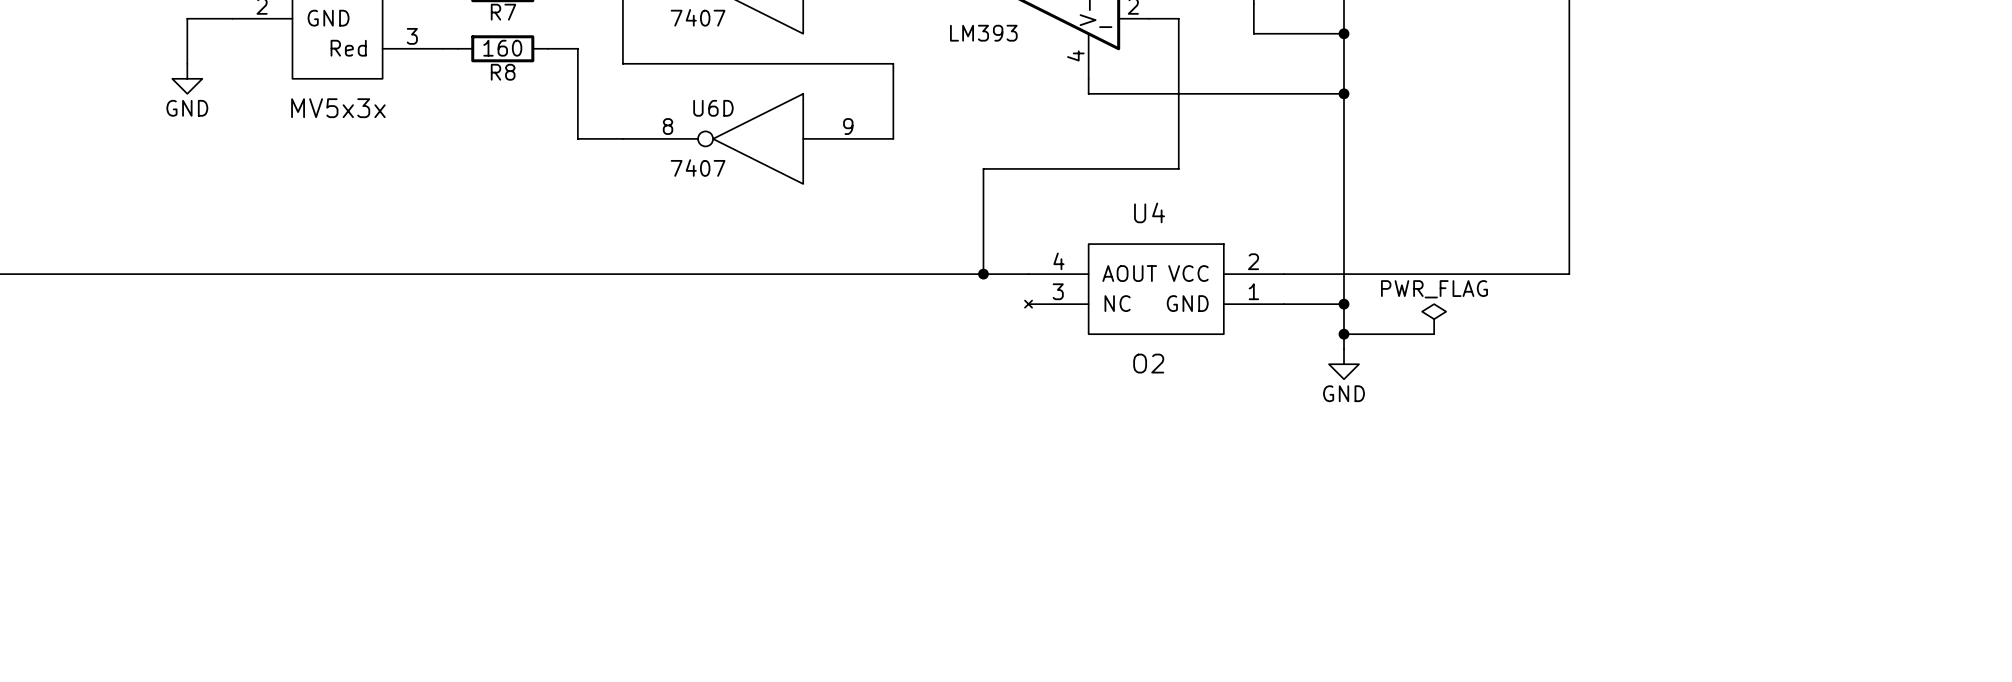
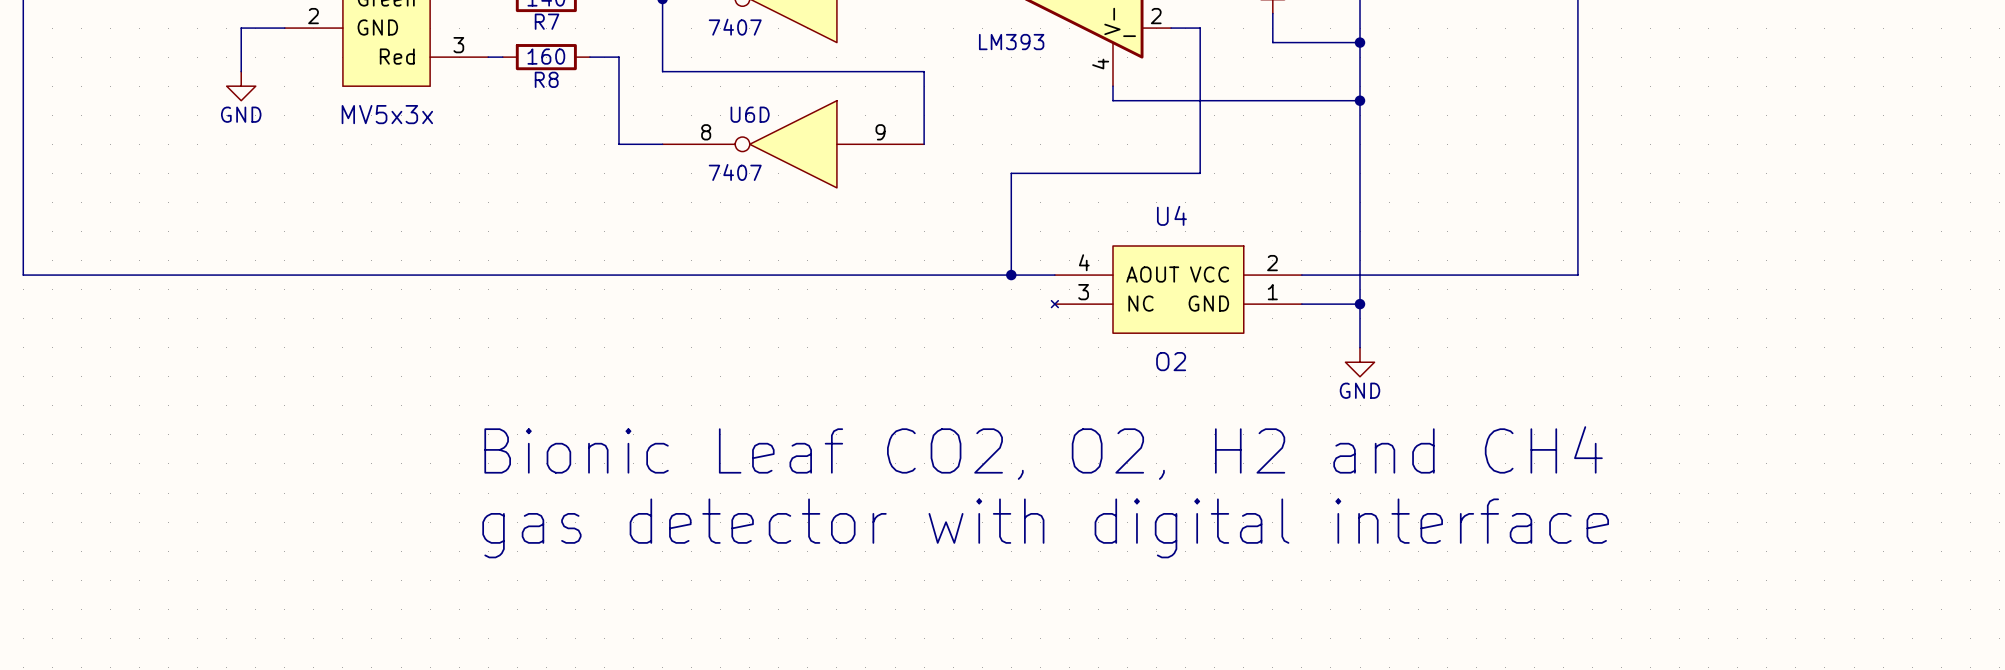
power symbol: PWR_FLAG (1434, 319) -> none
wire: (1344, 334) (1434, 334) -> none
junction: (1344, 334) -> none
text: none -> Bionic Leaf CO2, O2, H2 and CH4 (1043, 453)
text: none -> gas detector with digital interface (1045, 528)

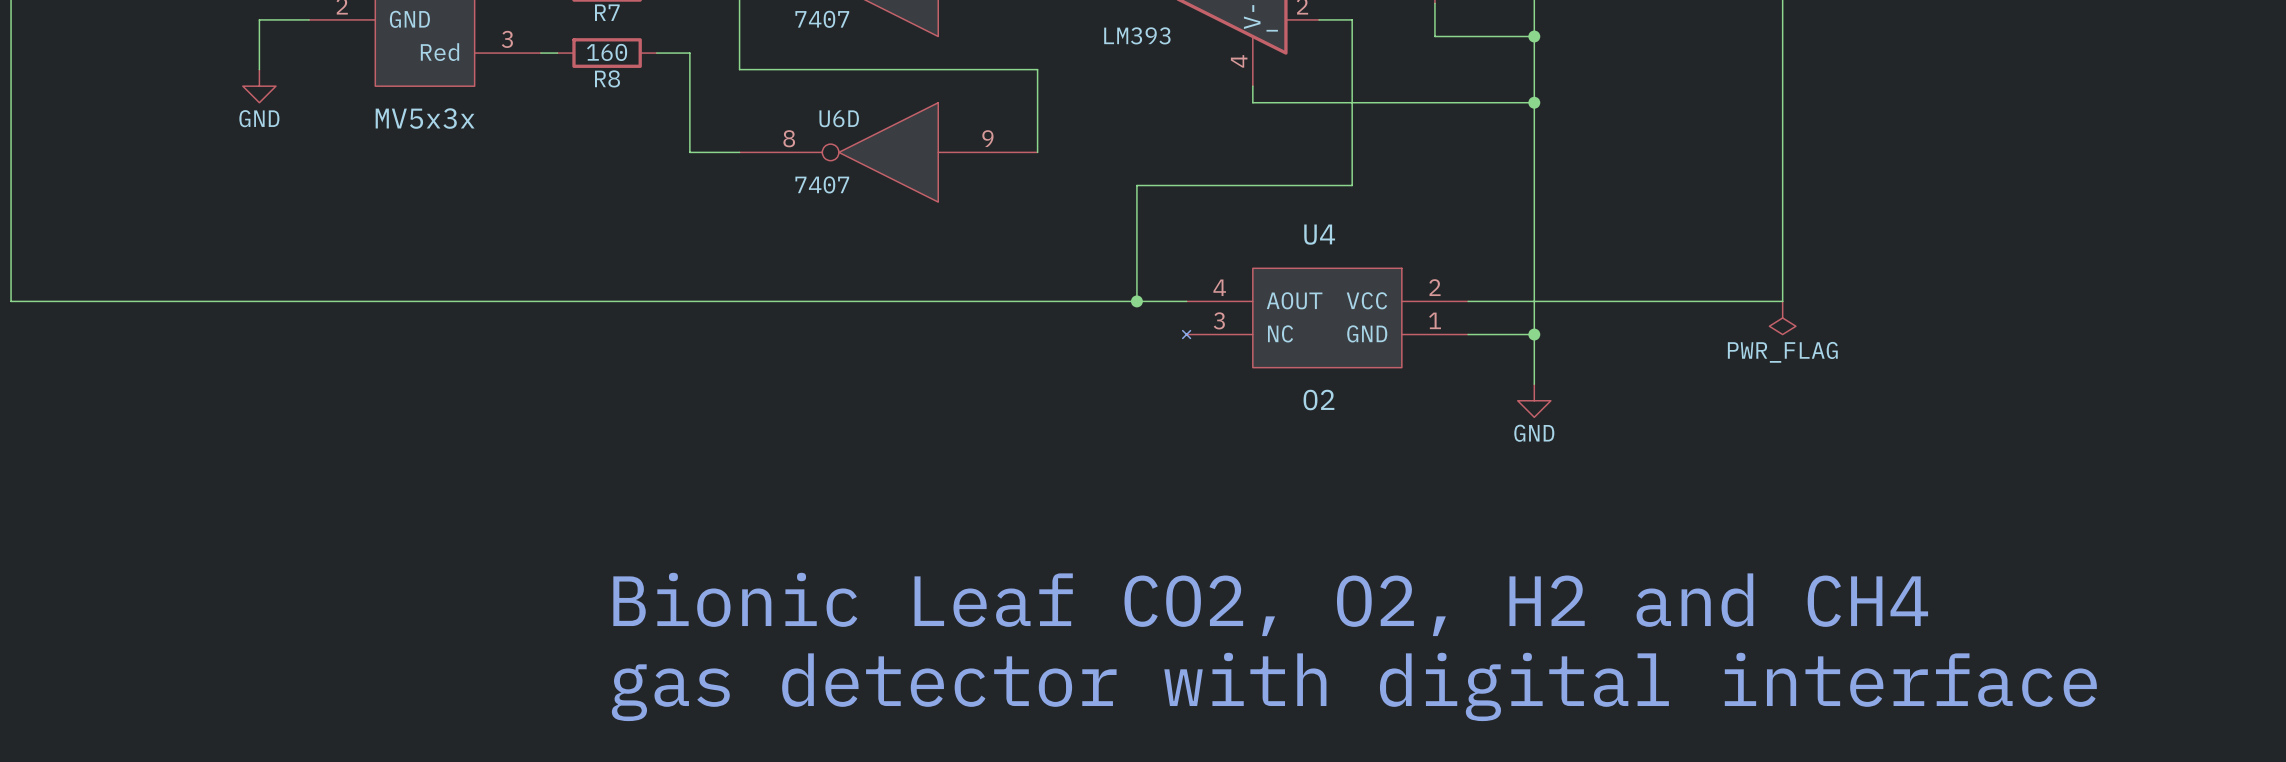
power symbol: none -> PWR_FLAG (1782, 317)
text position: Bionic Leaf CO2, O2, H2 and CH4 (1043, 453) -> Bionic Leaf CO2, O2, H2 and CH4 (1270, 604)
text position: gas detector with digital interface (1045, 528) -> gas detector with digital interface (1354, 686)

